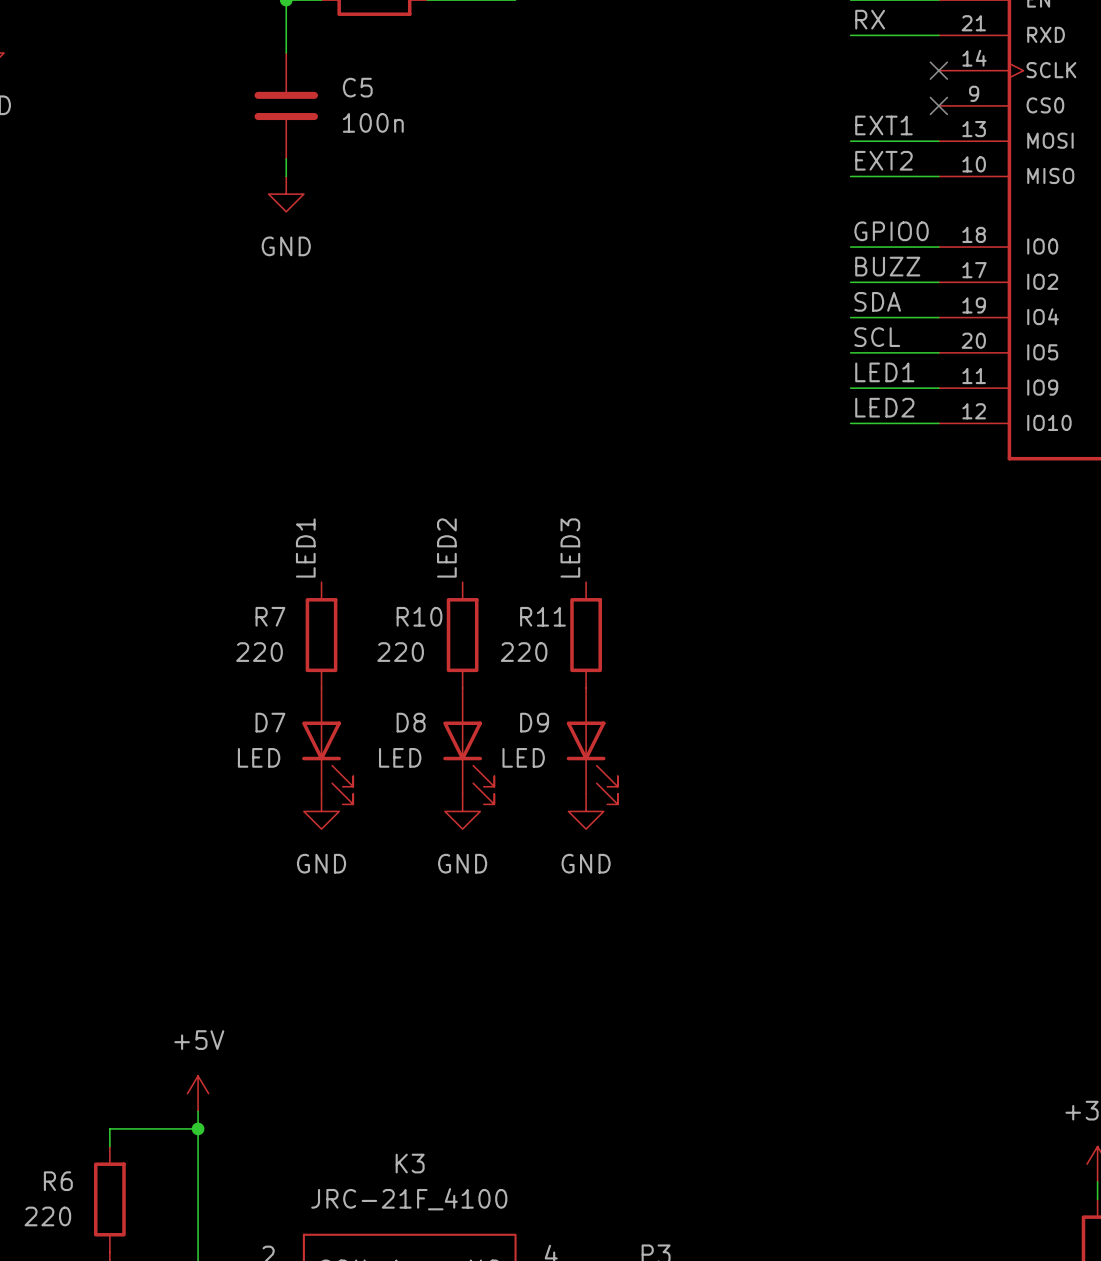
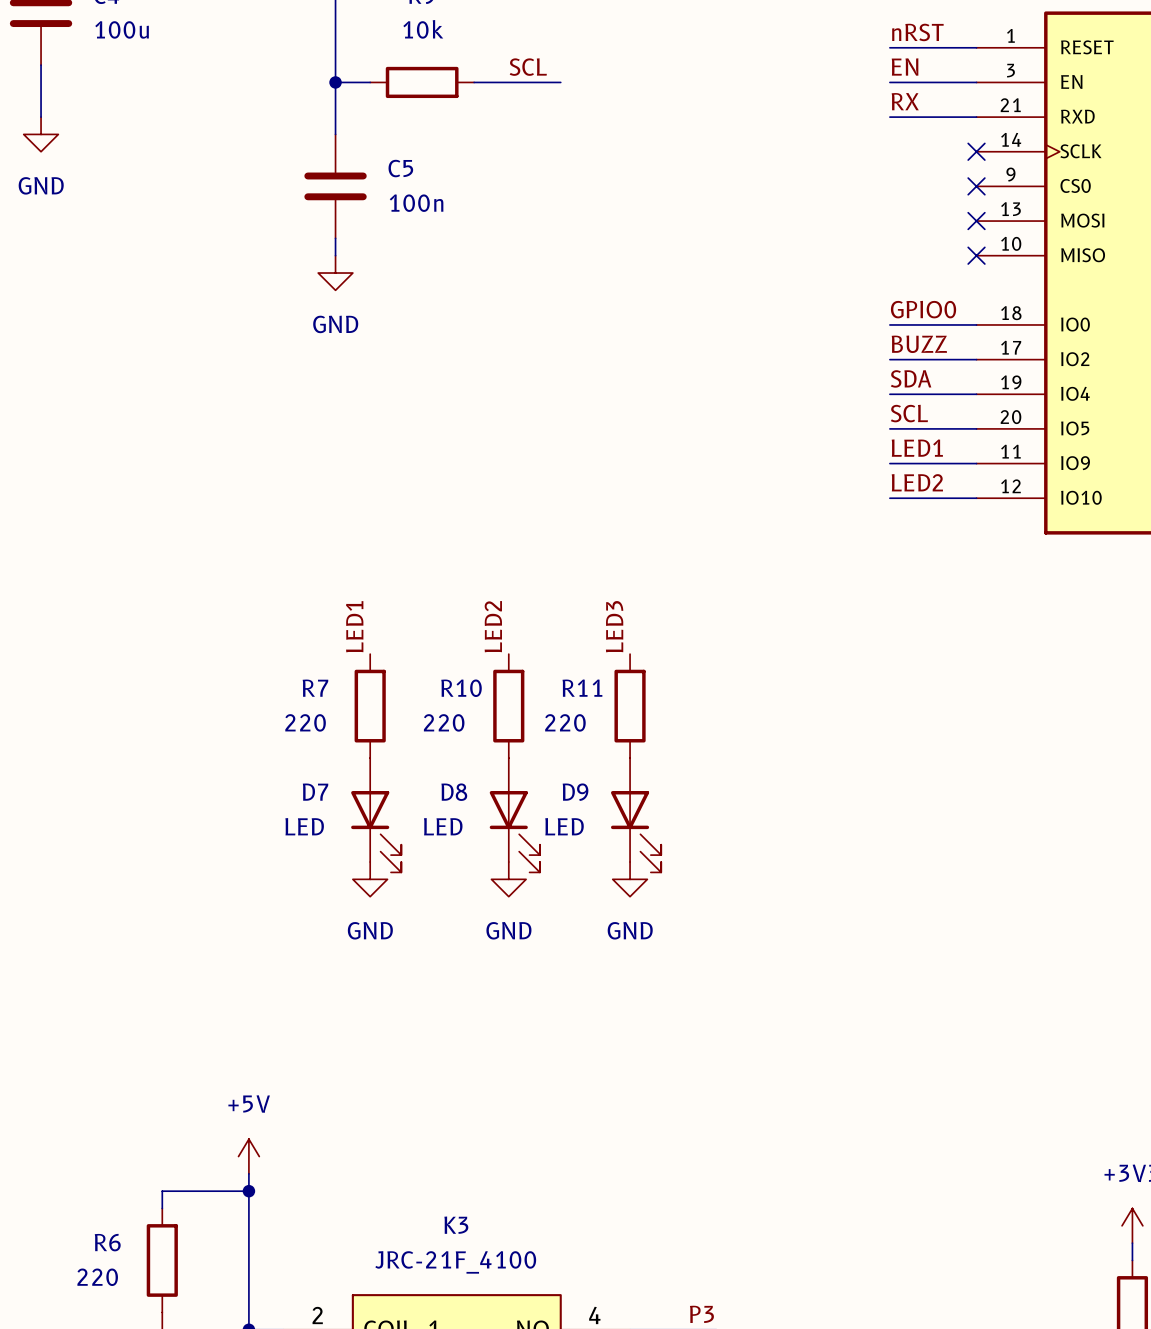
label: EXT1 (883, 125) -> none
wire: (850, 141) (938, 141) -> none
no-connect mark: none -> (976, 221)
label: EXT2 (883, 160) -> none
wire: (850, 176) (938, 176) -> none
no-connect mark: none -> (976, 255)

